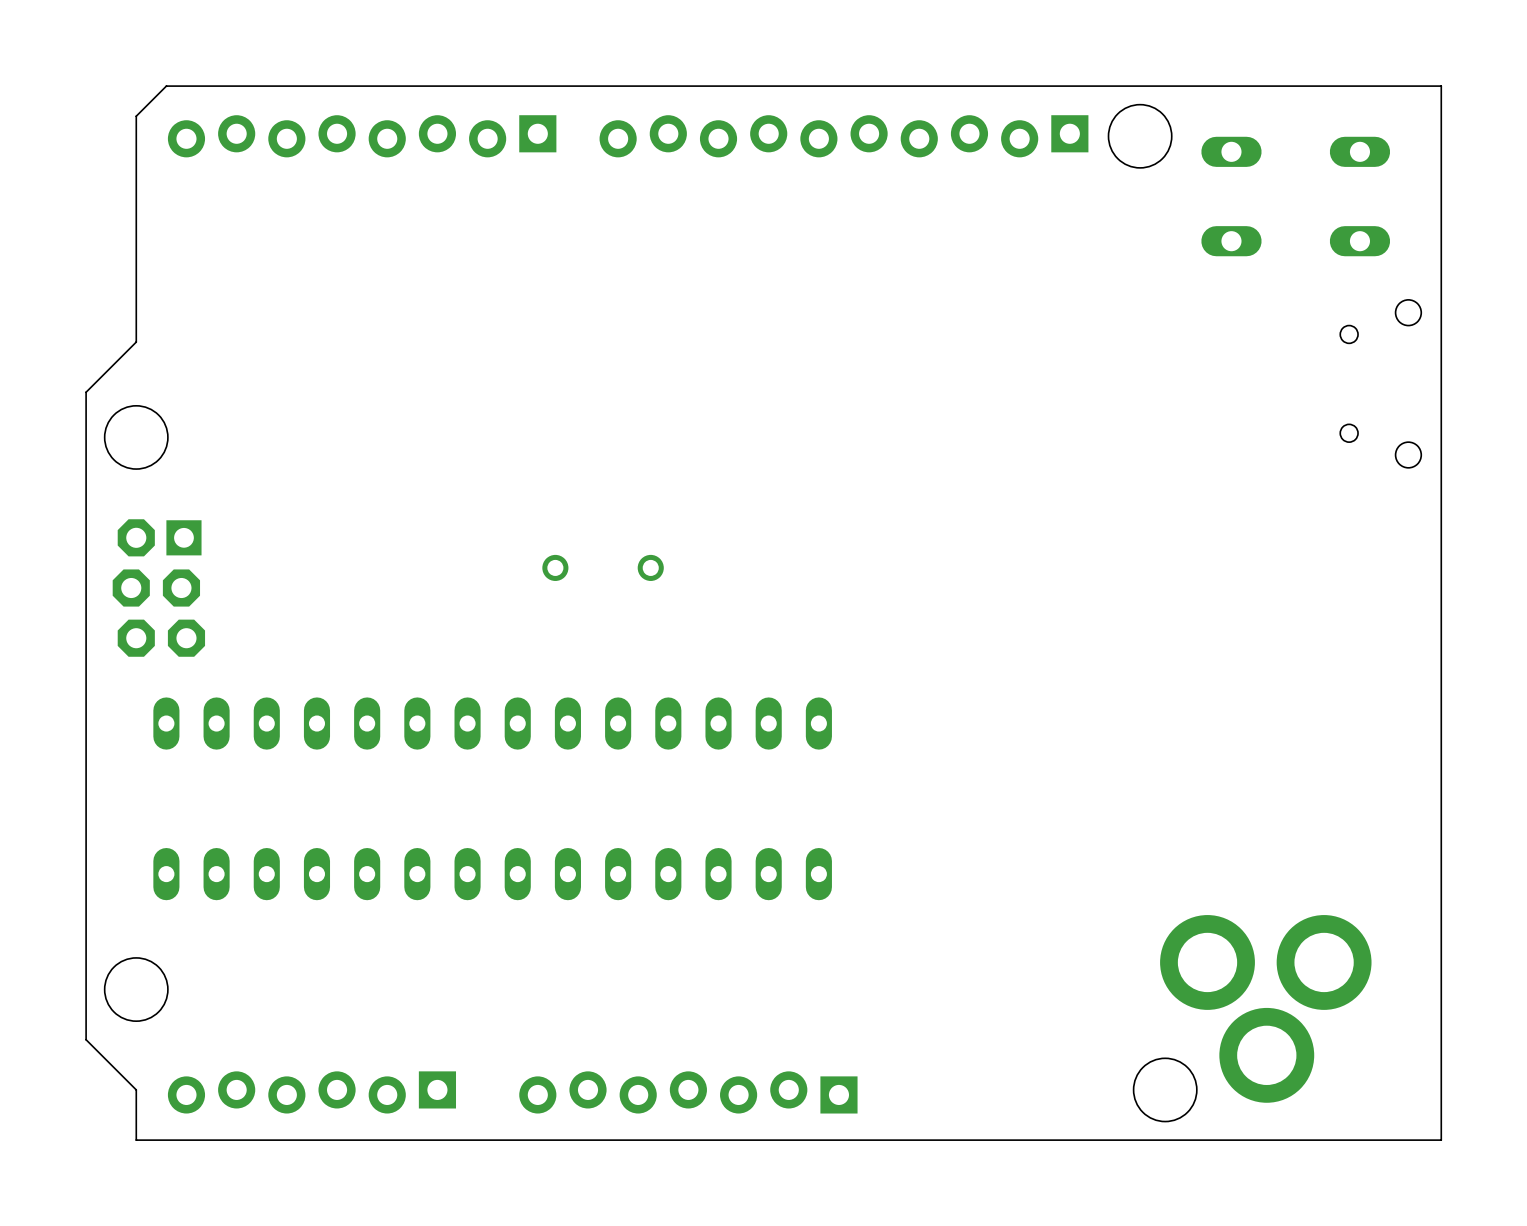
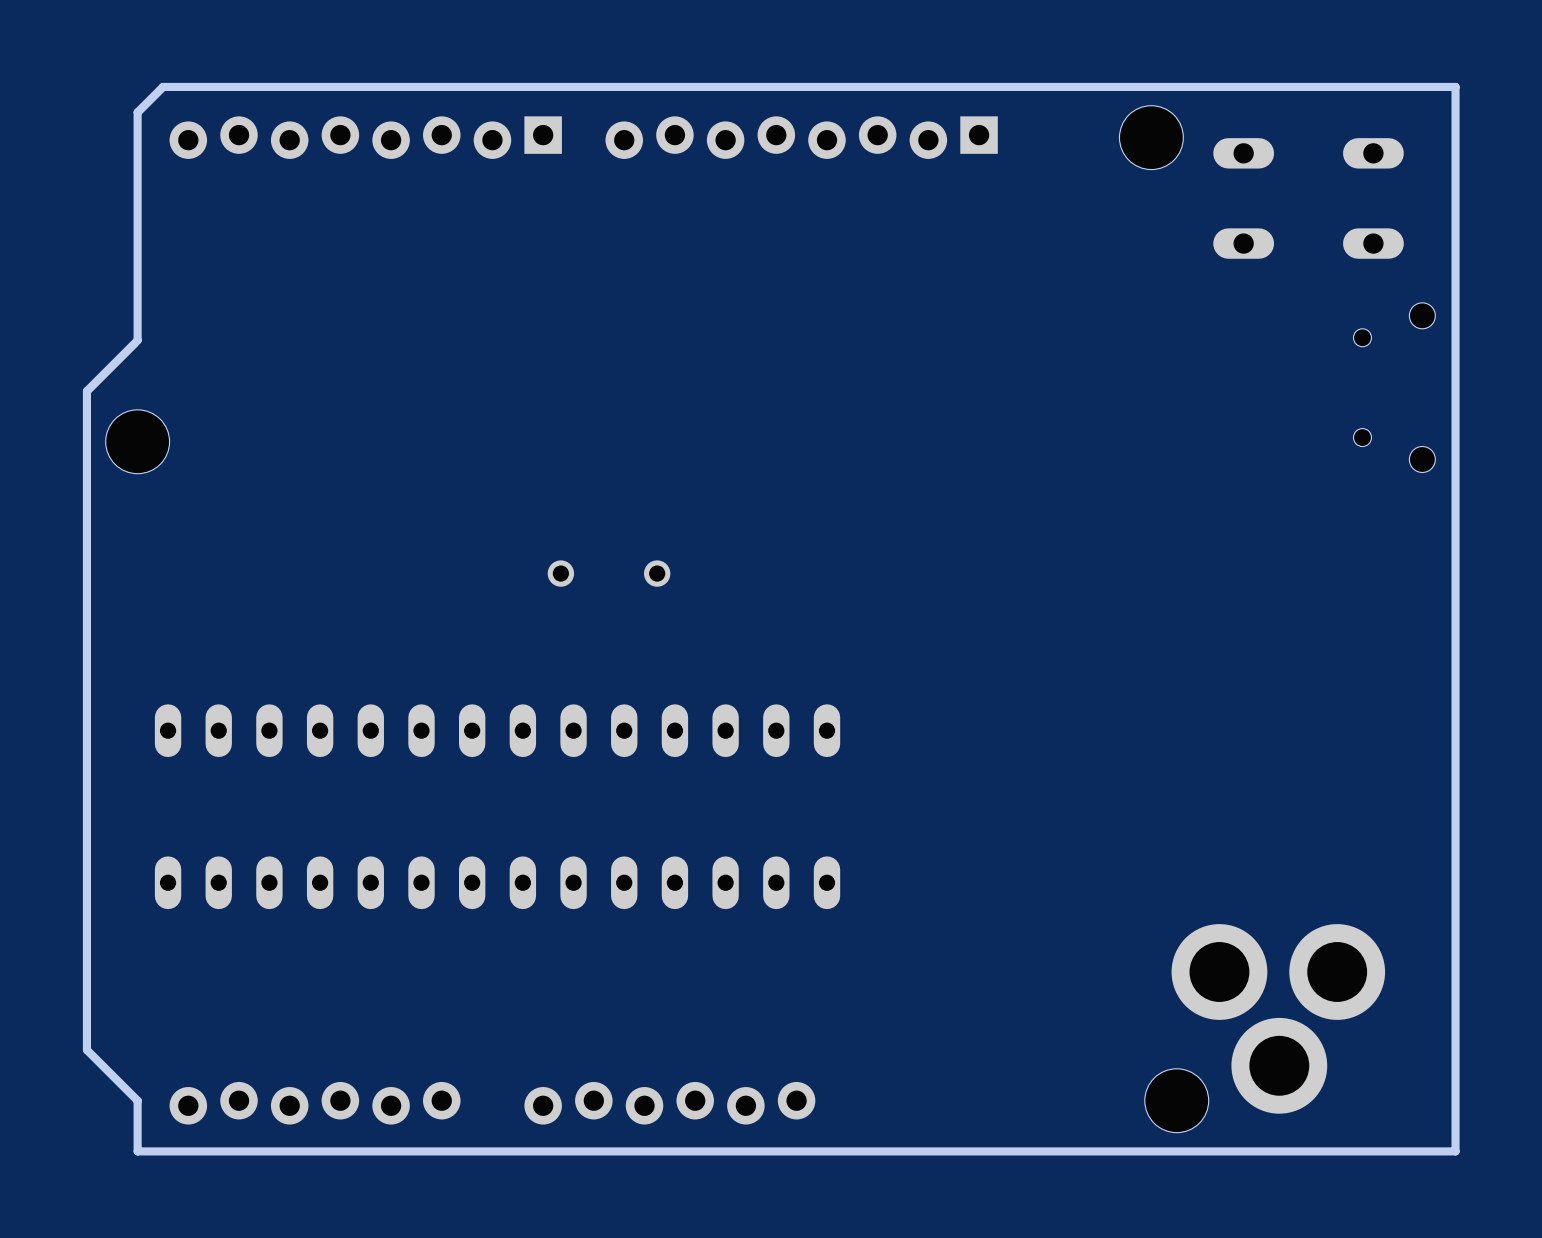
part footprint: [86, 86, 1442, 1141] -> [86, 86, 1456, 1152]
board edge: none -> (1455, 86) (162, 86) (137, 112) (137, 340) (86, 391) (86, 1050) (137, 1100) (137, 1151) (1455, 1151) (1455, 86)

